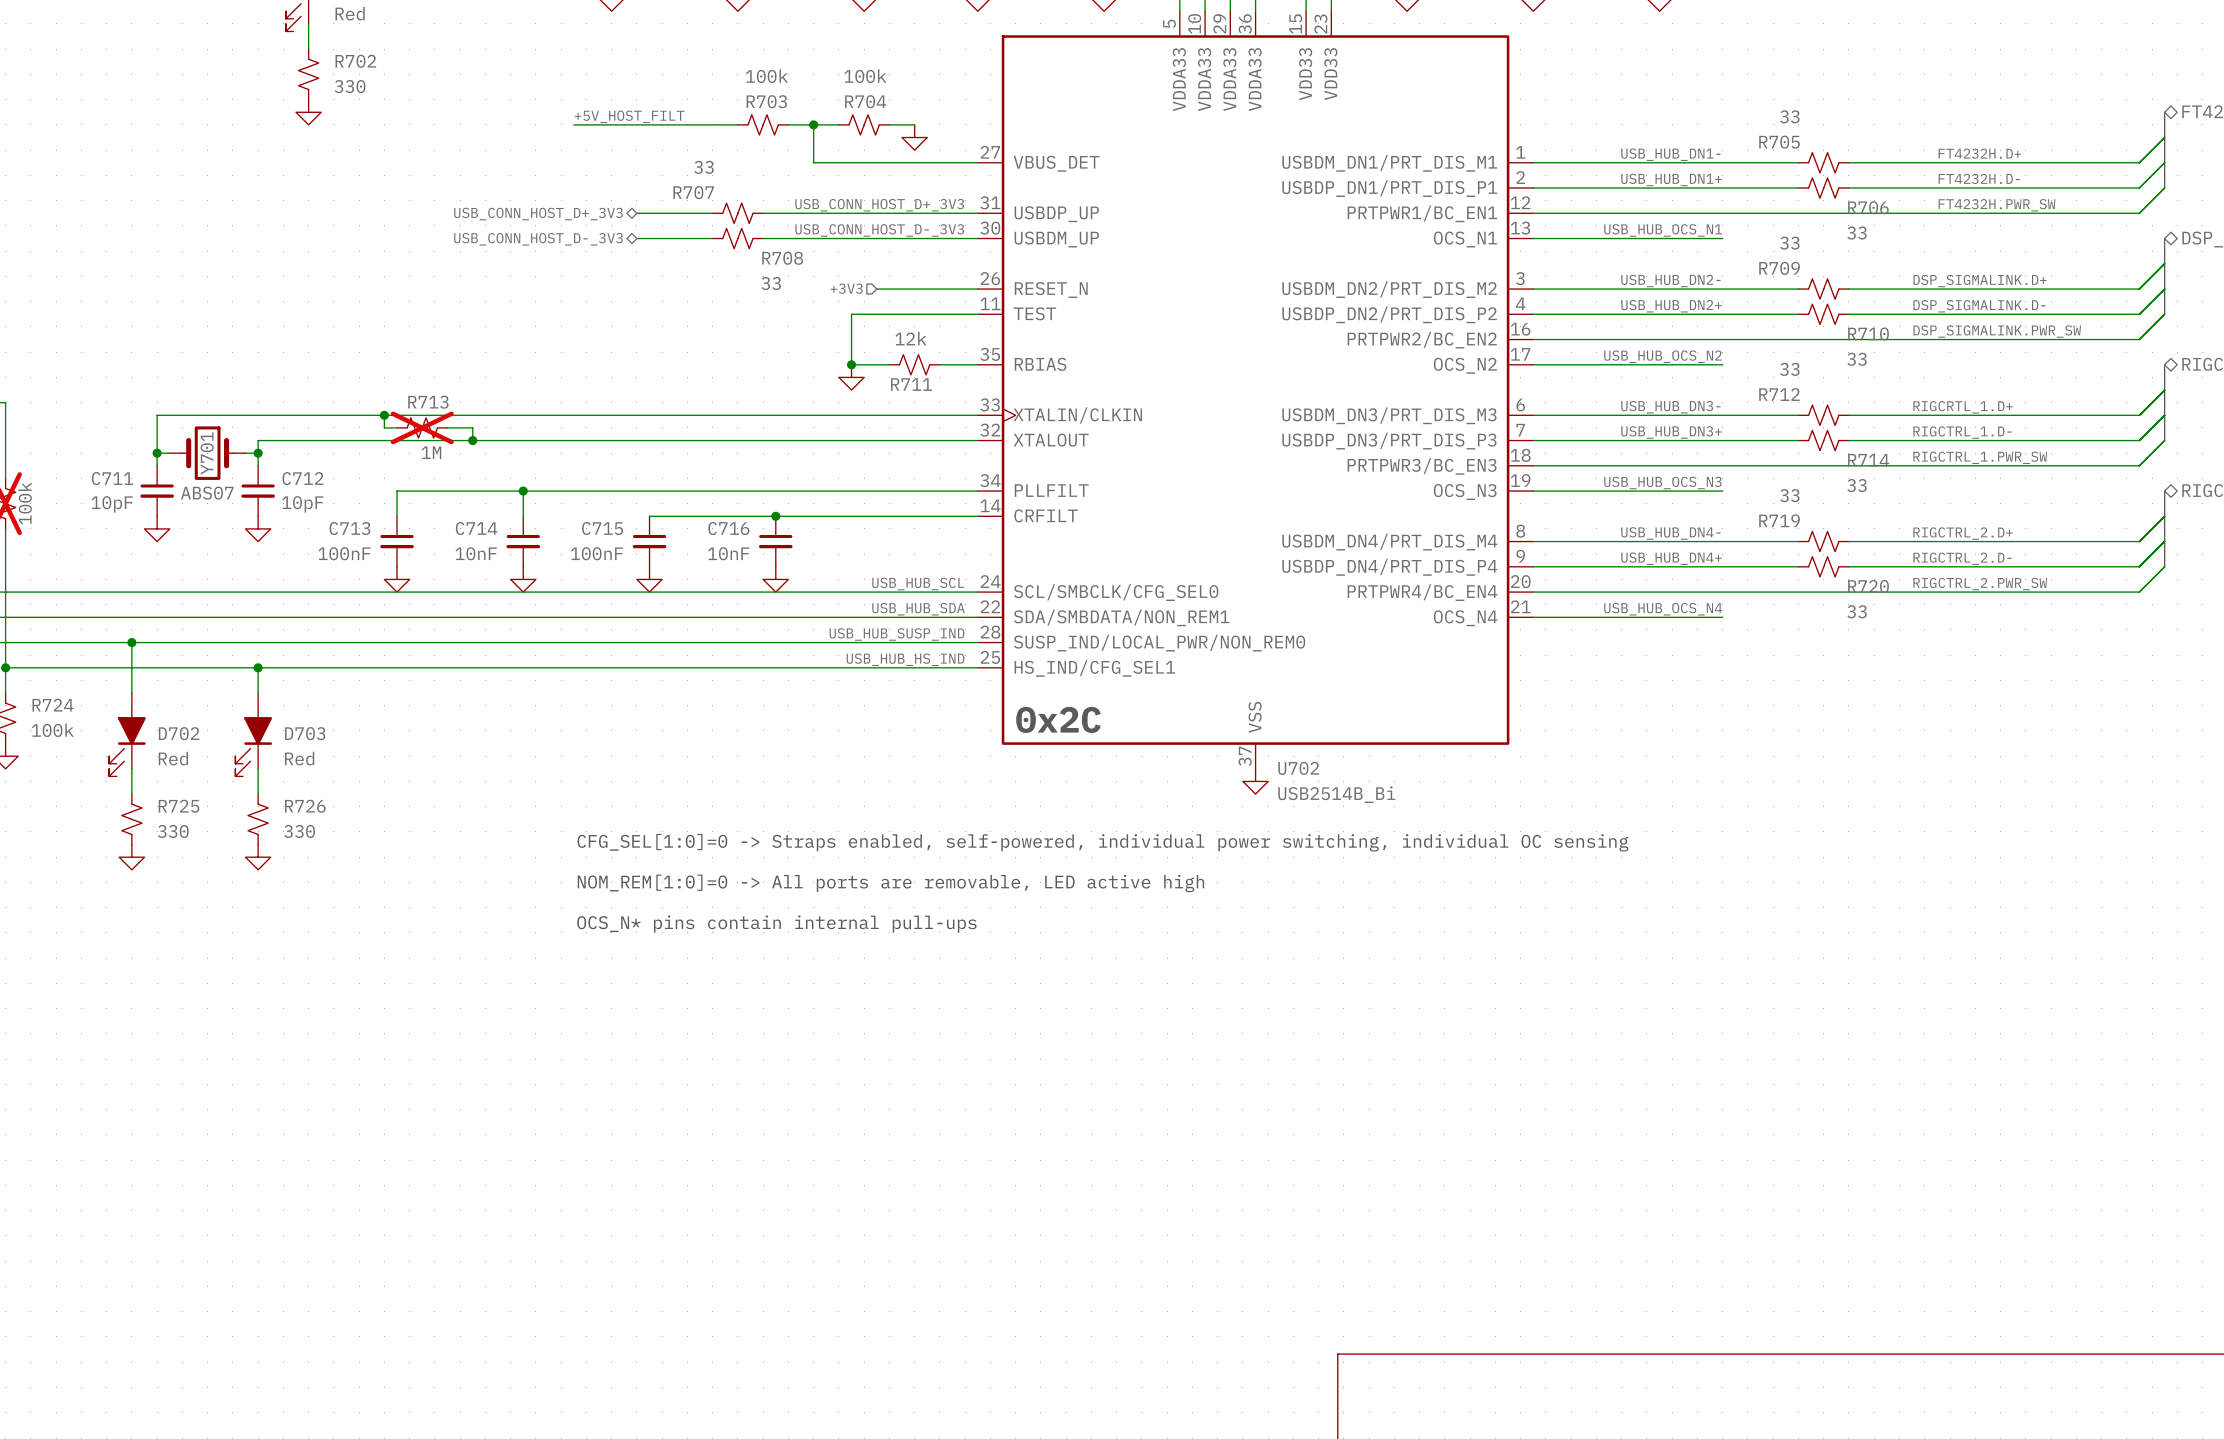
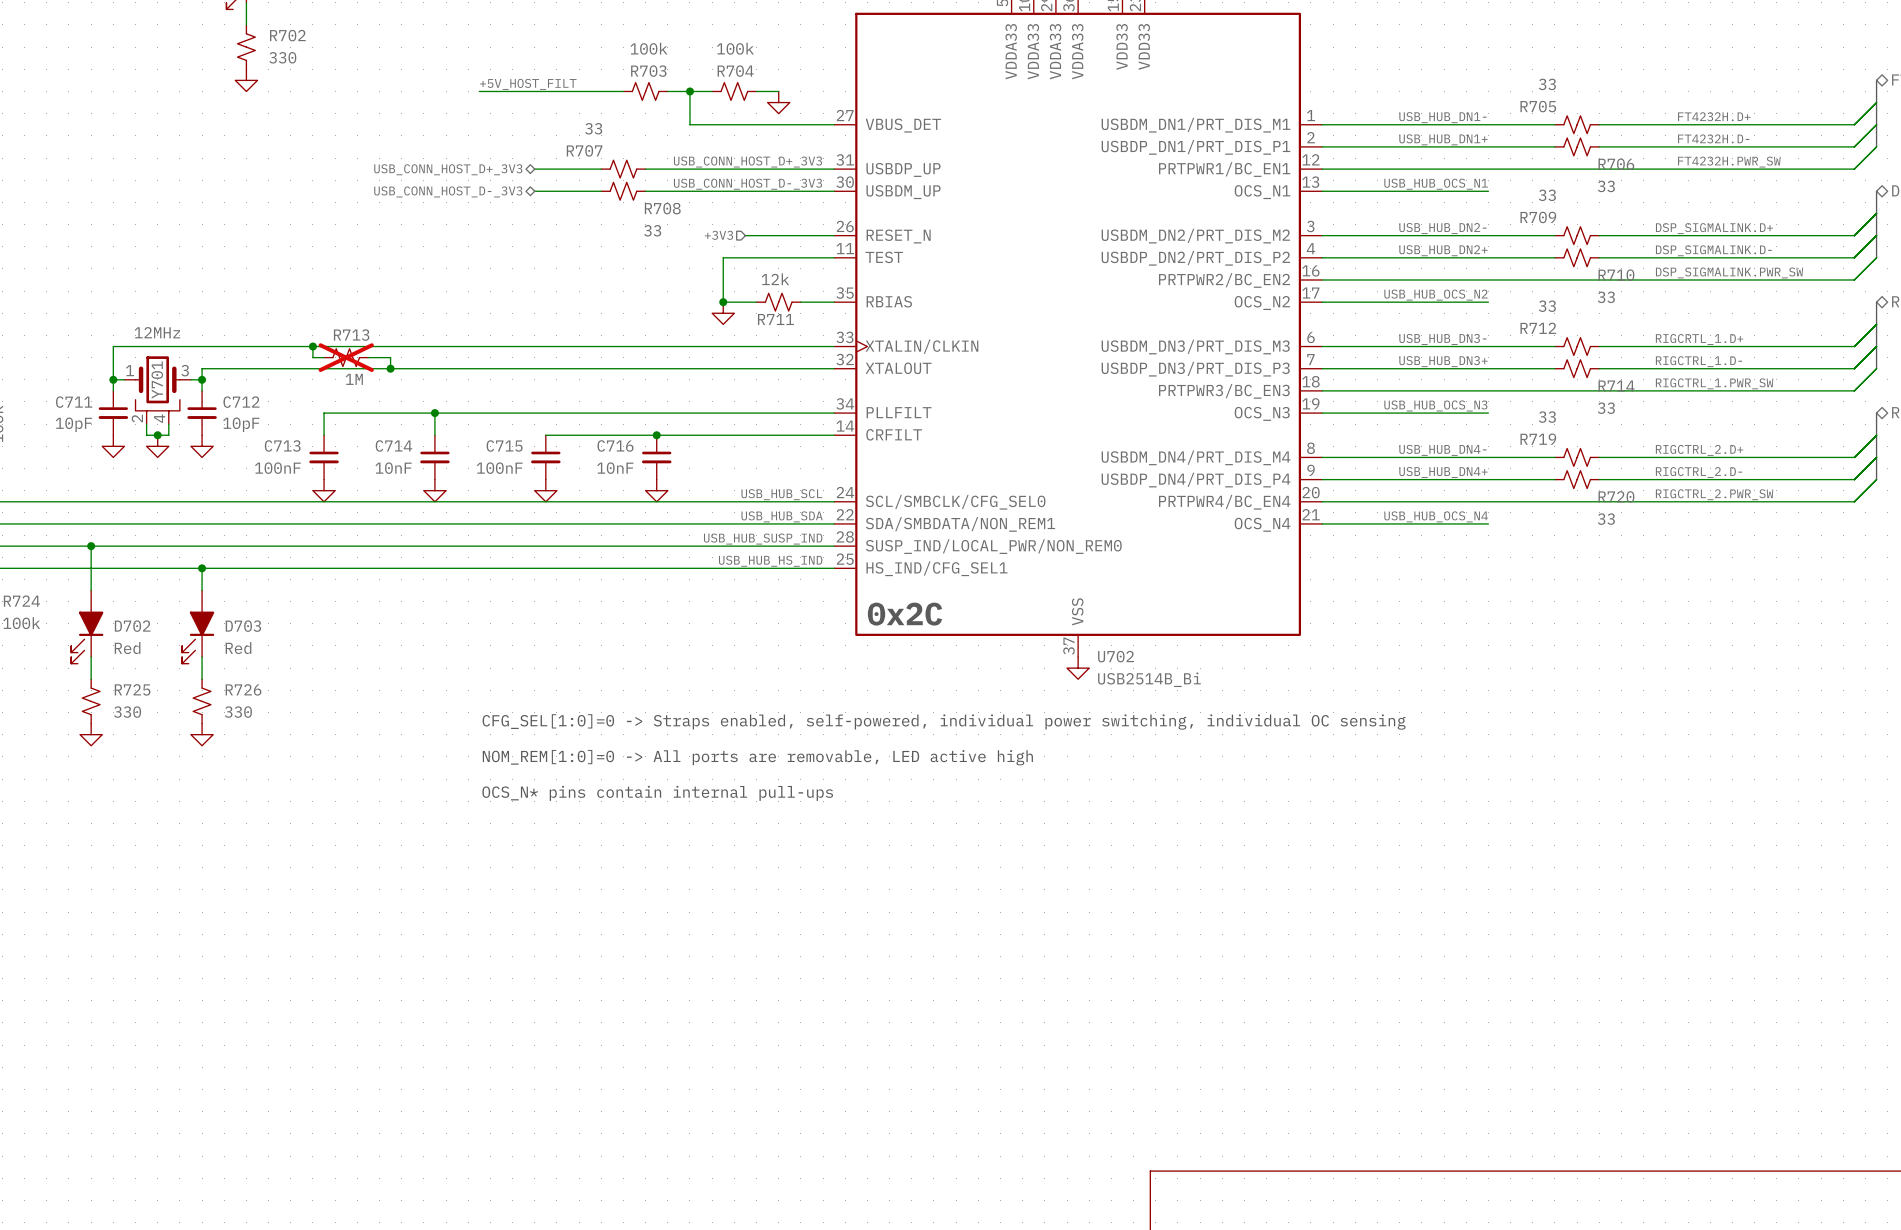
Y701 symbol: [169, 426, 246, 480] -> [124, 356, 191, 425]
Y701 value: ABS07 (207, 493) -> 12MHz (157, 332)
wire: none -> (146, 424) (146, 435) (168, 435) (168, 424)
junction: none -> (157, 435)
power symbol: none -> (157, 446)

